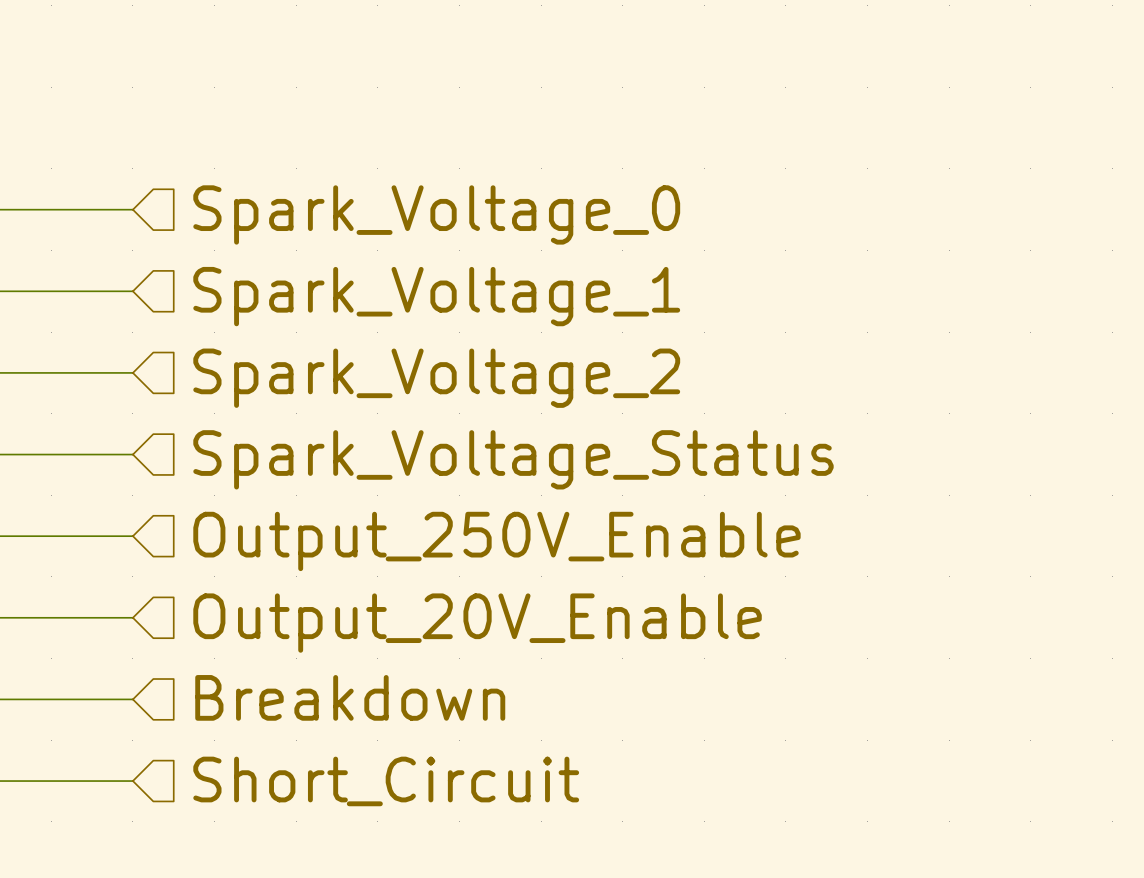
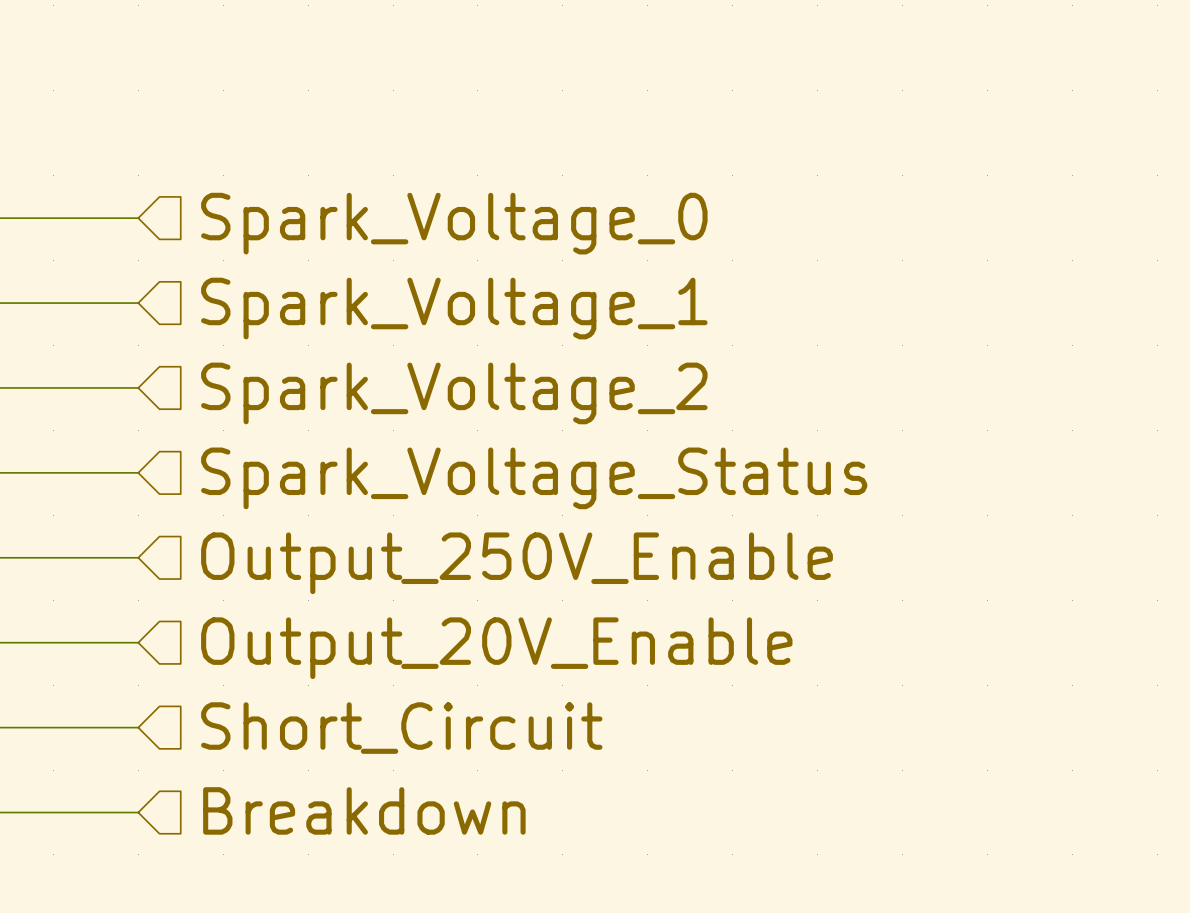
hierarchical label: Breakdown (350, 697) -> Short_Circuit (401, 728)
hierarchical label: Short_Circuit (386, 781) -> Breakdown (364, 810)

